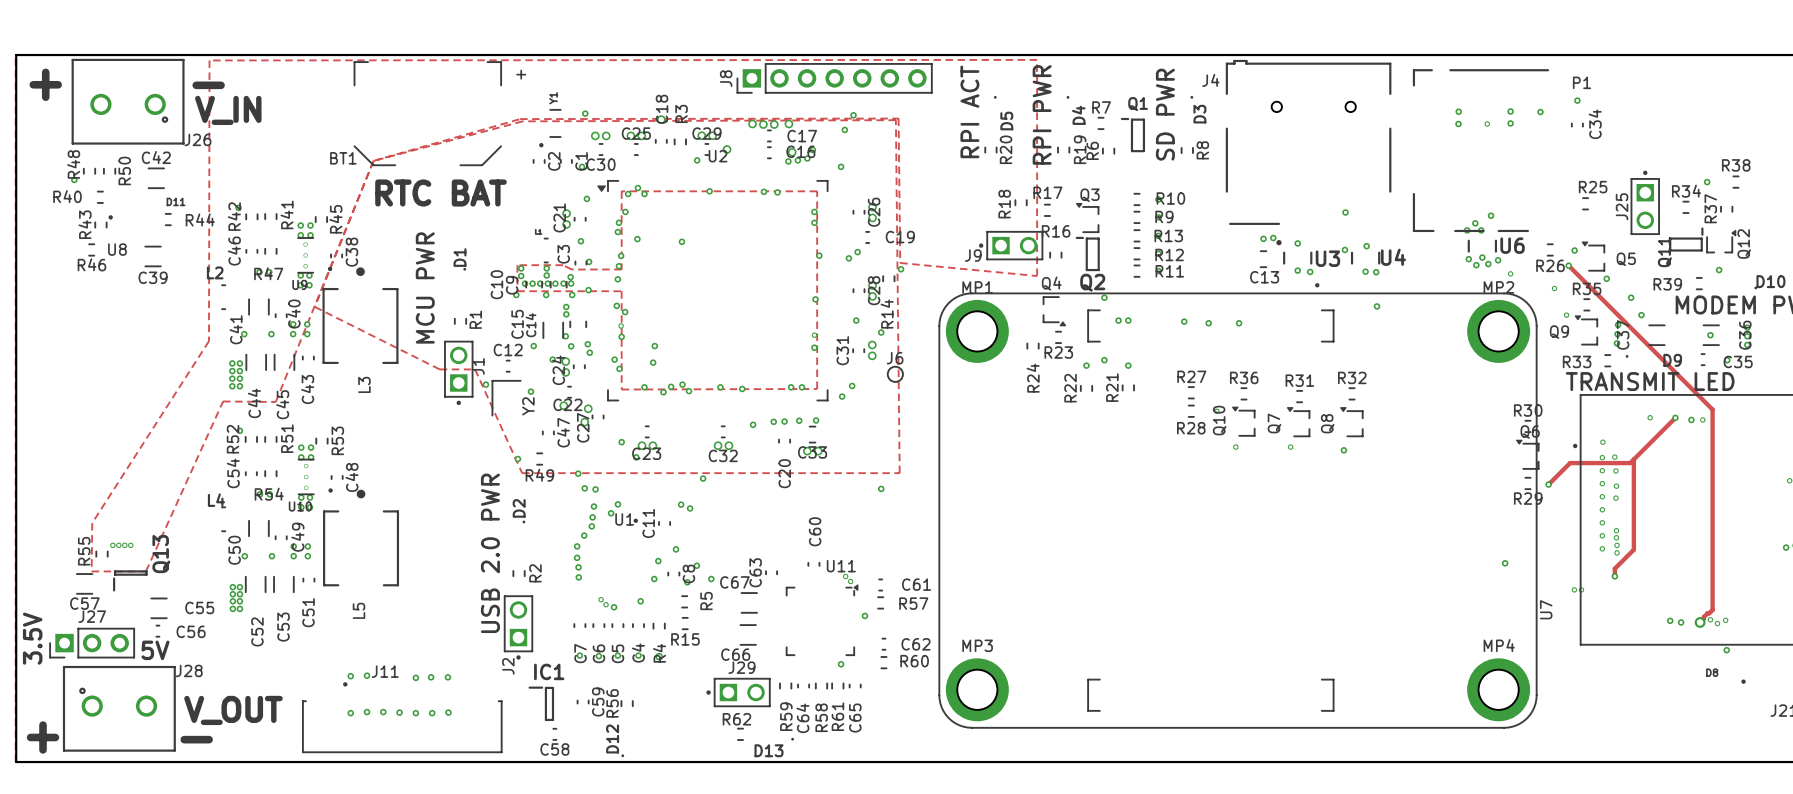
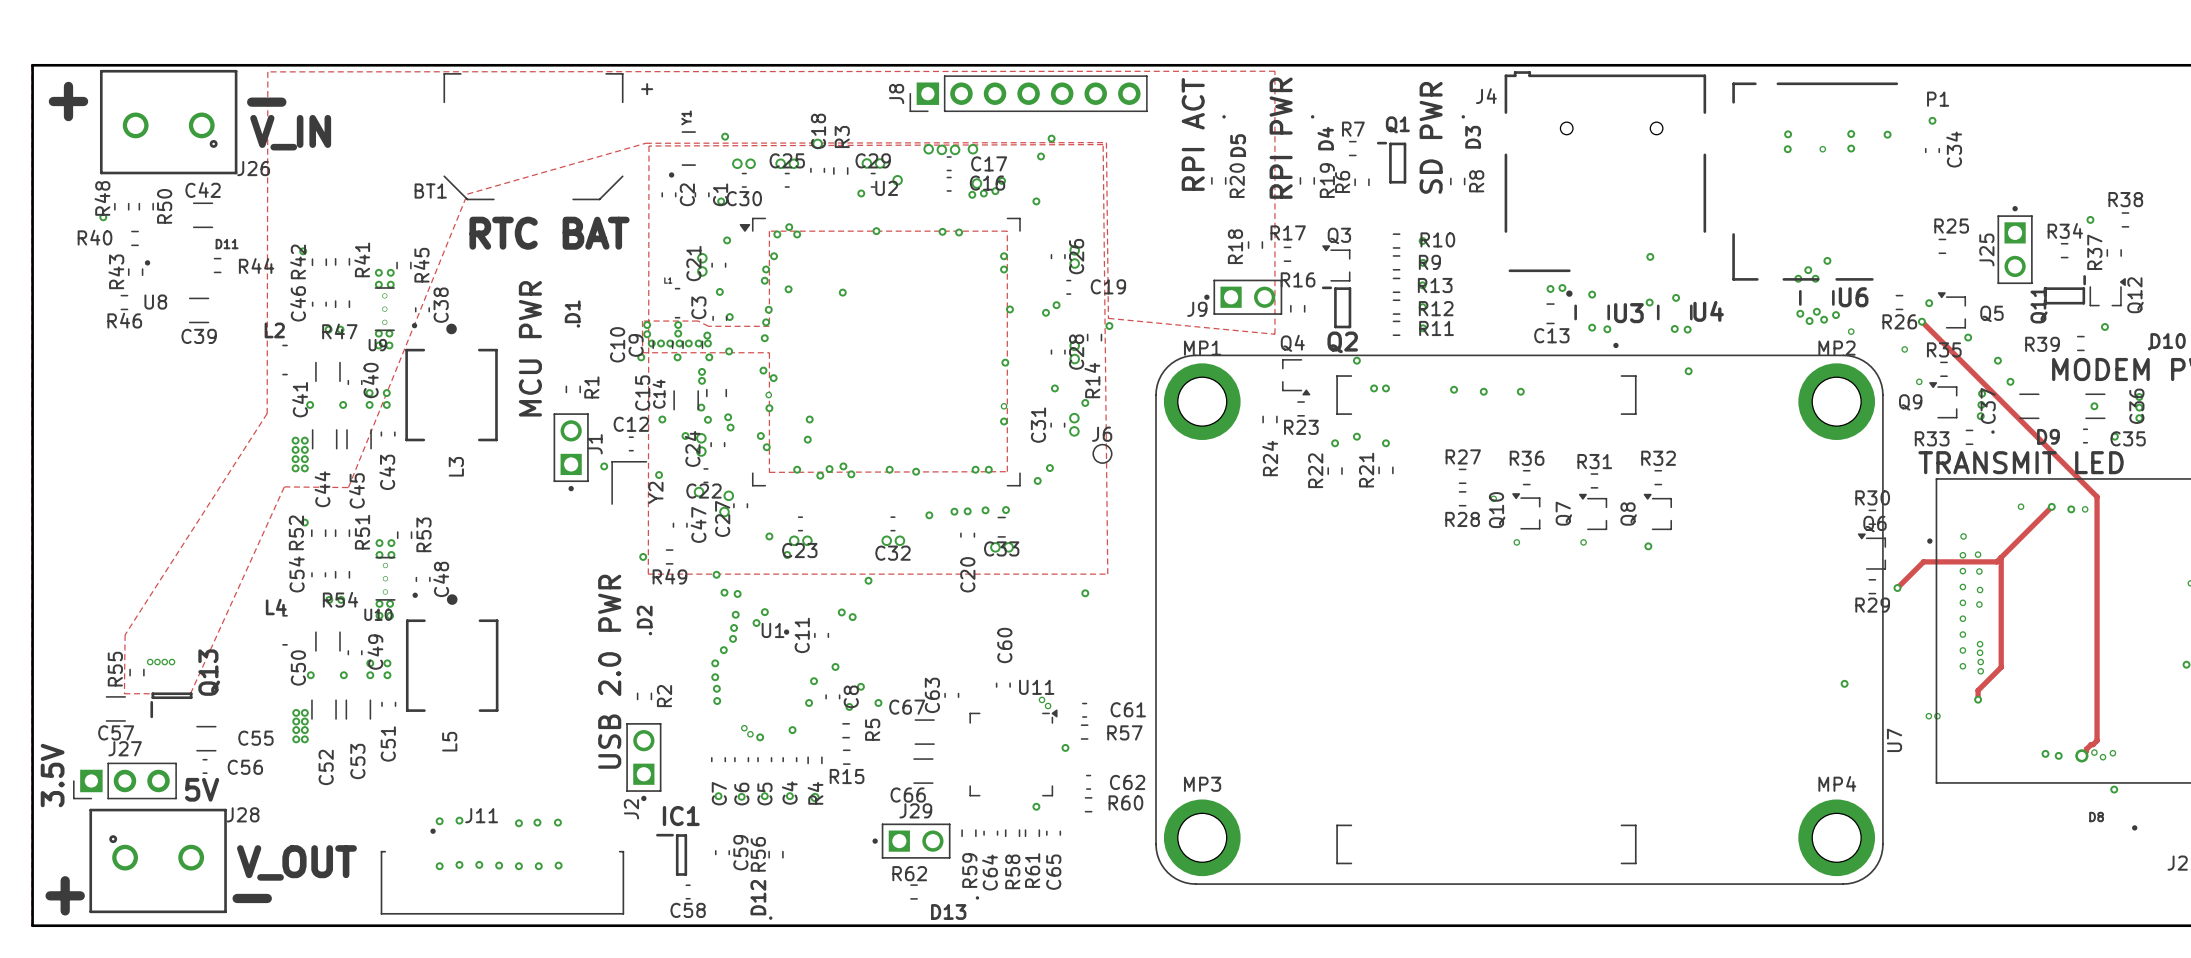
zone outline: (522, 121) (373, 160) (314, 306) (439, 369) (475, 369) (522, 473) -> (648, 145) (648, 574)

